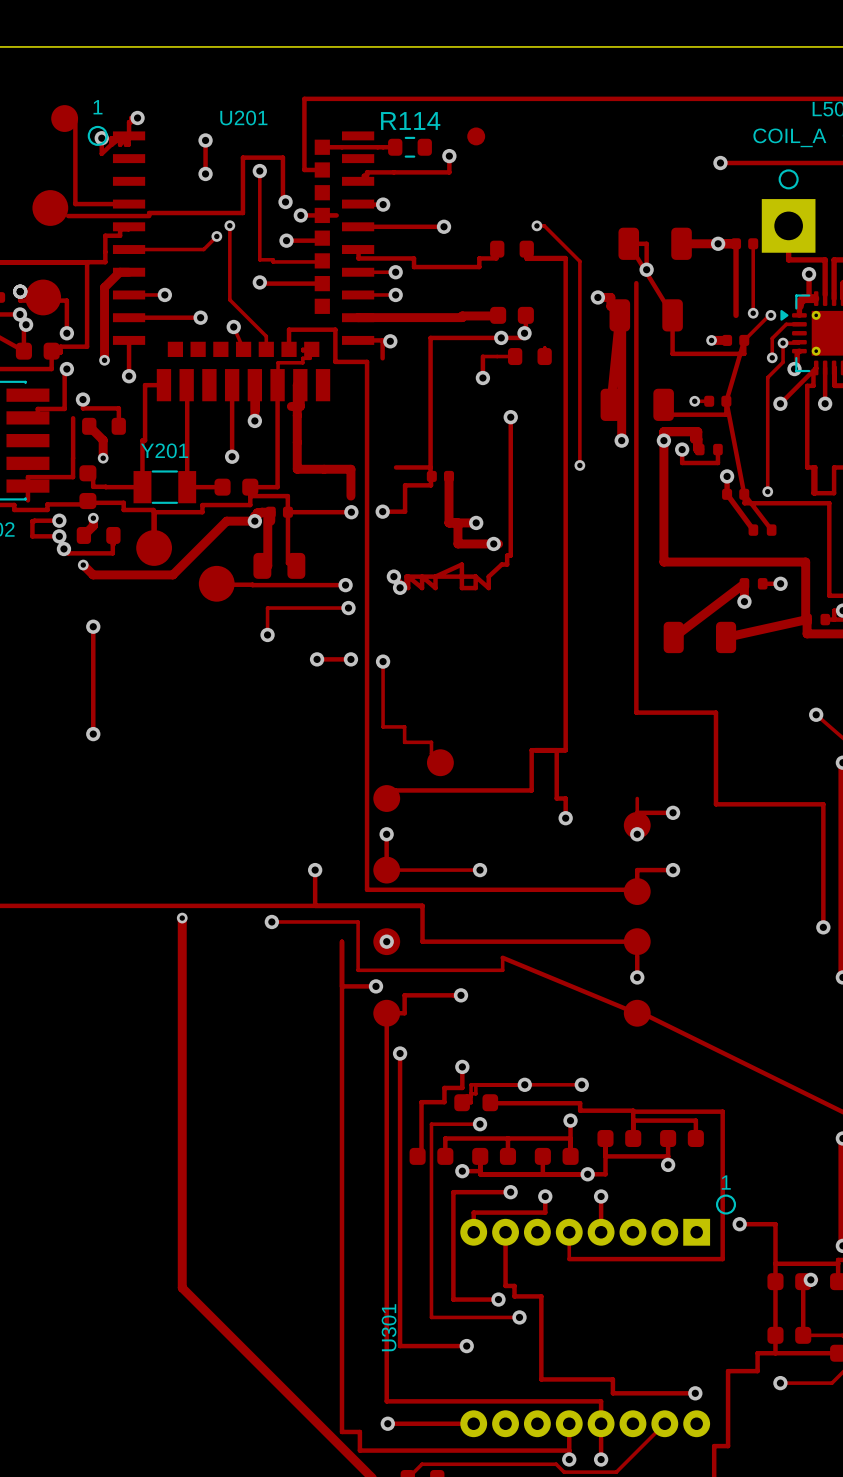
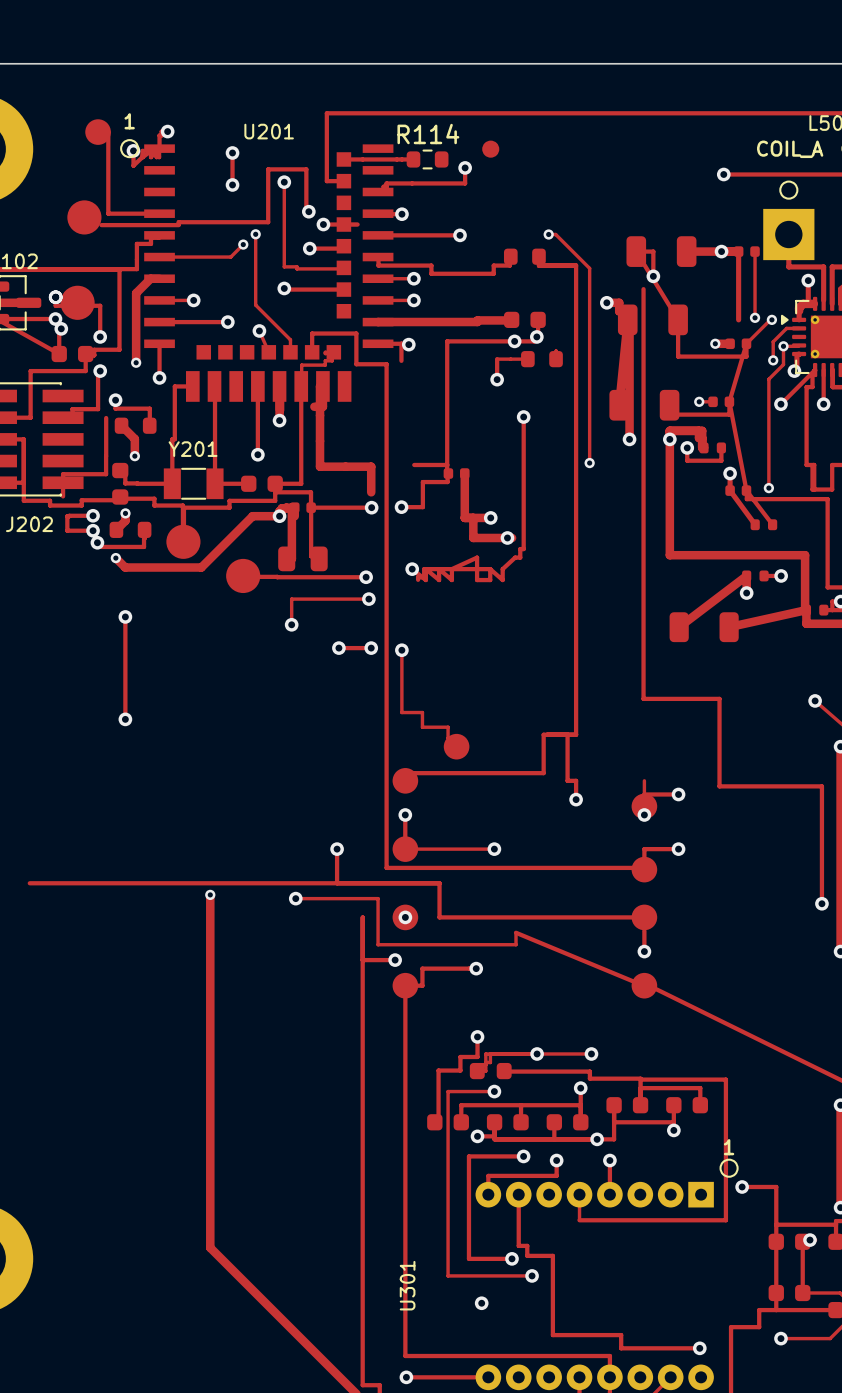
via: (400, 587) -> none
track: (400, 1053) (400, 1346) (466, 1346) -> none
via: (400, 1053) -> none

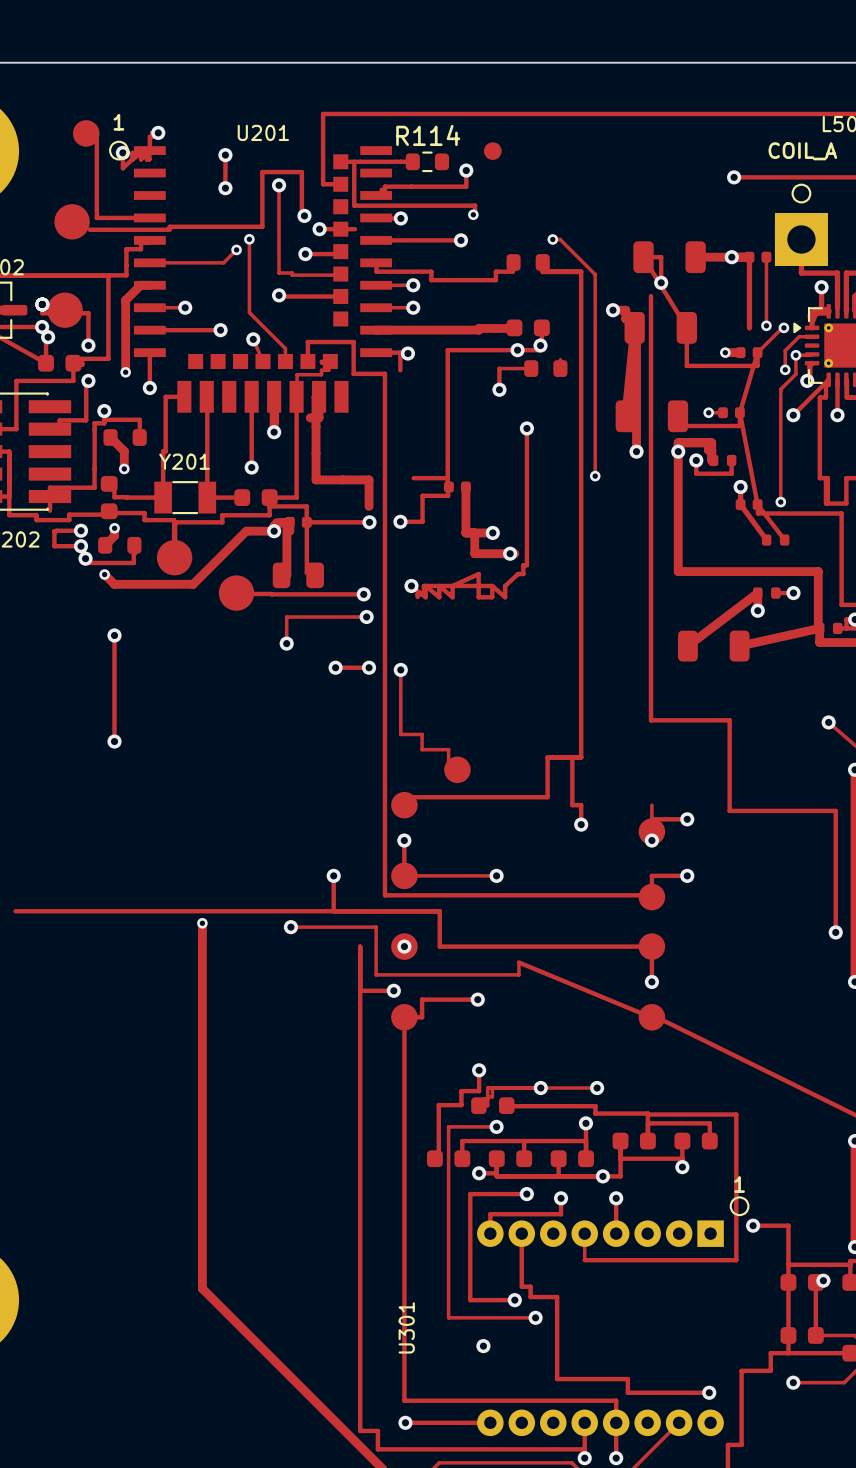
track: none -> (354, 161) (354, 205) (475, 205) (475, 214) (473, 214)
via: none -> (473, 214)
track: none -> (104, 419) (104, 423) (94, 423) (94, 429)

